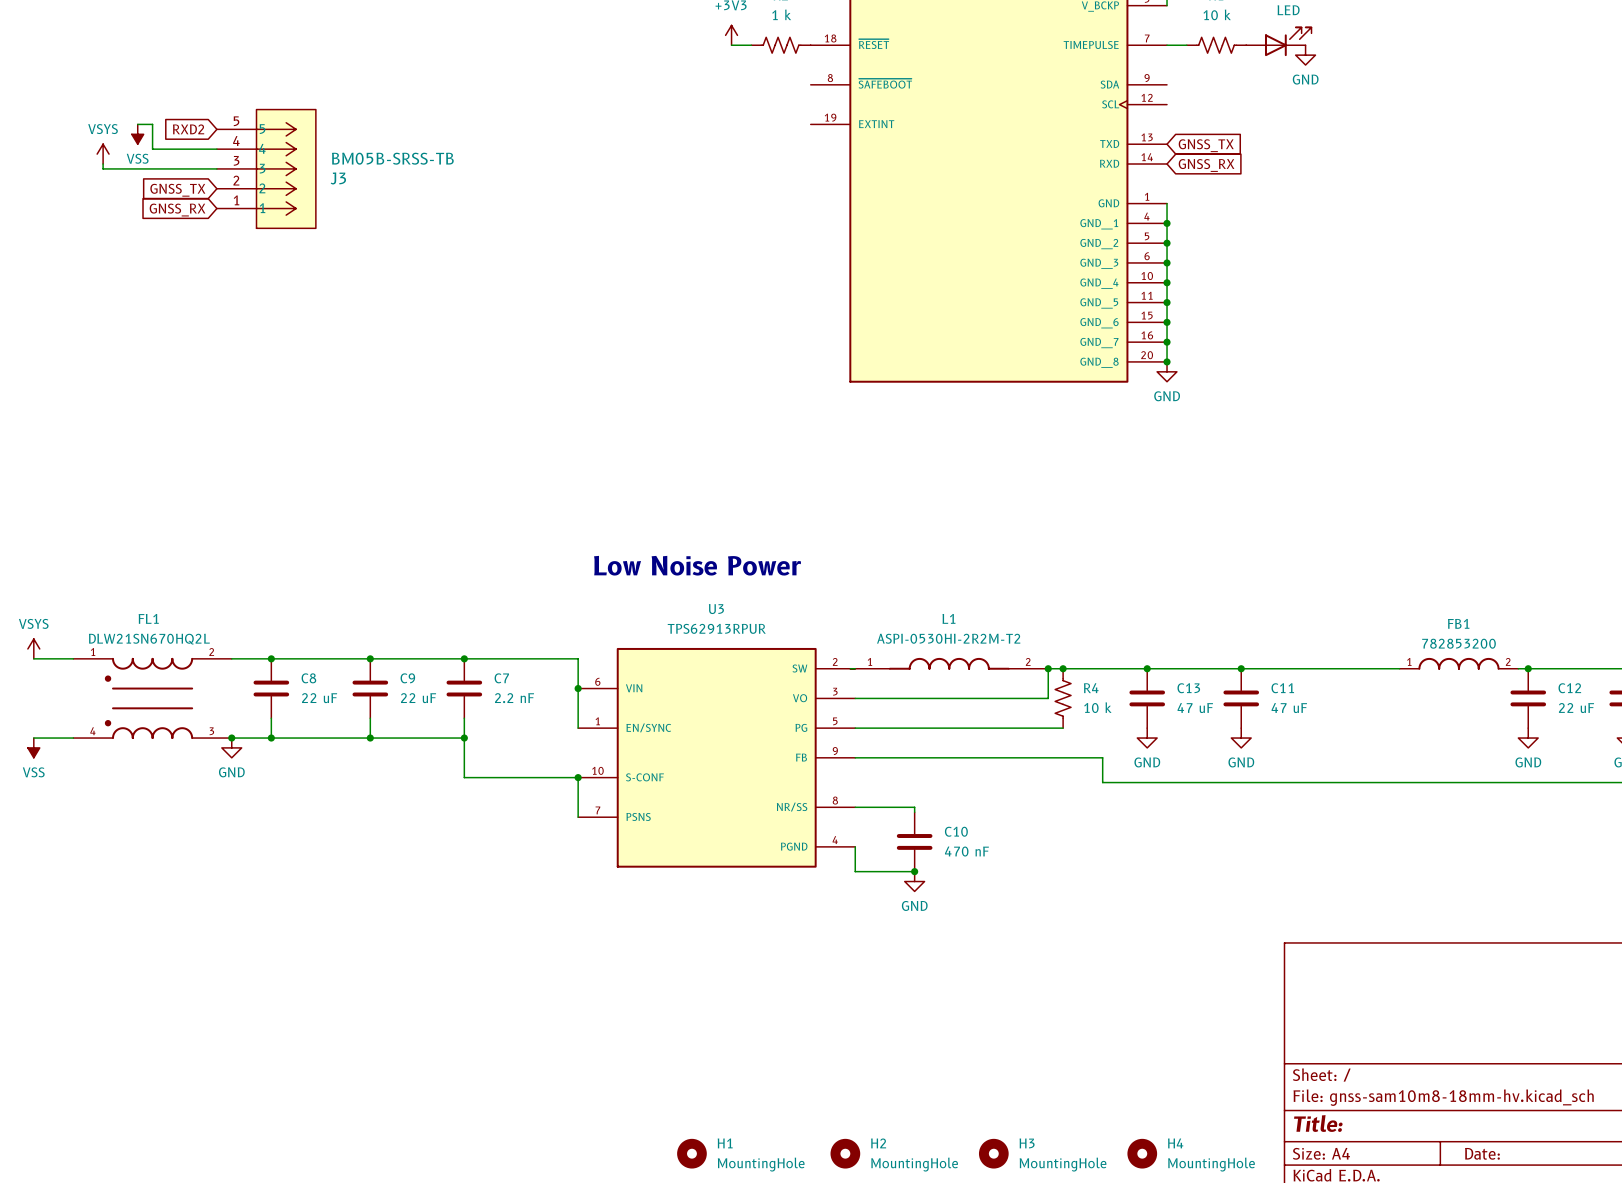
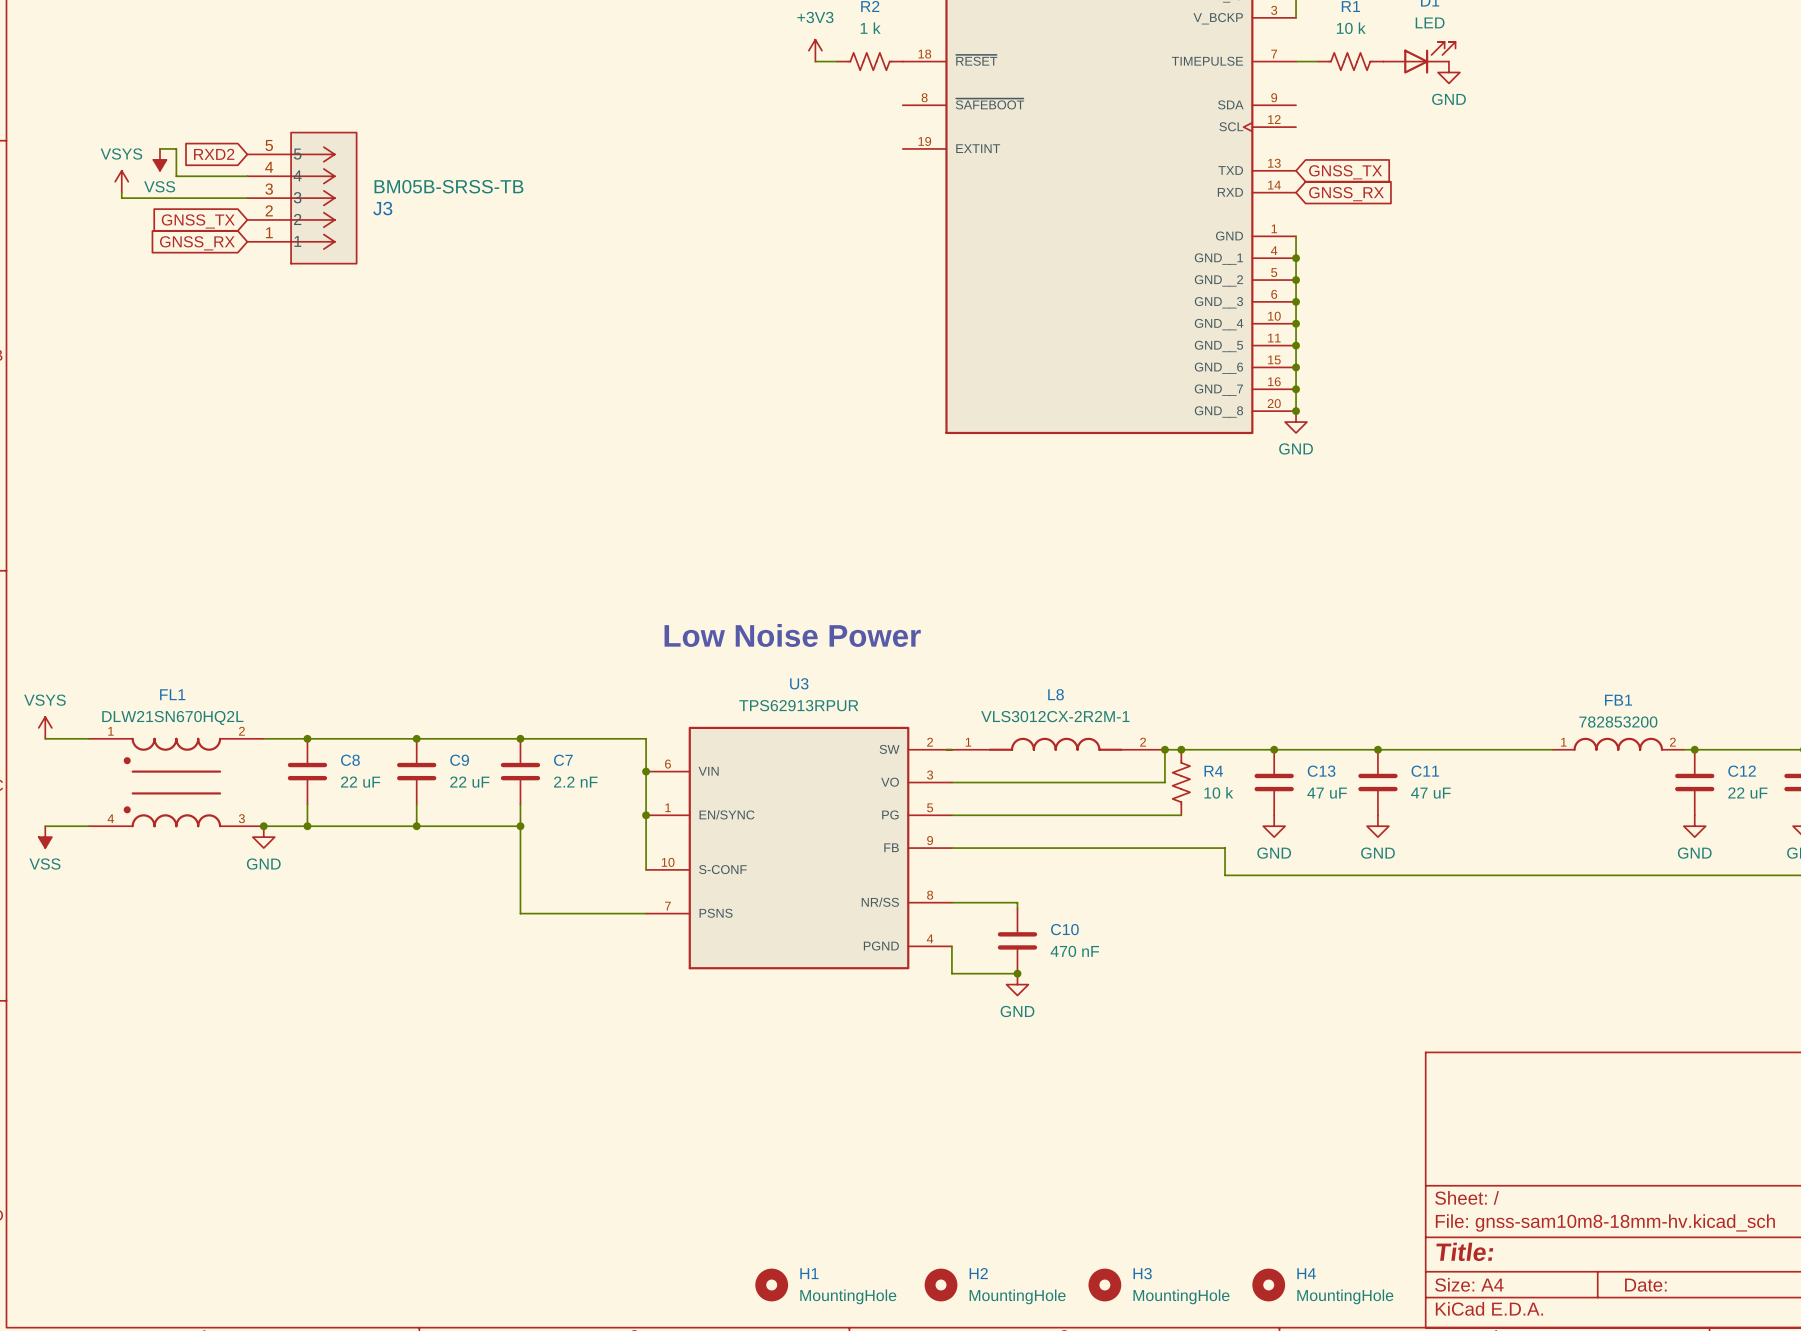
L1 name: L1 (948, 618) -> L8 (1056, 694)
L1 value: ASPI-0530HI-2R2M-T2 (948, 638) -> VLS3012CX-2R2M-1 (1055, 716)
wire: none -> (646, 815) (646, 869)
junction: none -> (646, 815)
wire: (464, 777) (578, 777) (578, 817) -> (520, 869) (520, 913) (646, 913)
junction: (578, 777) -> none

